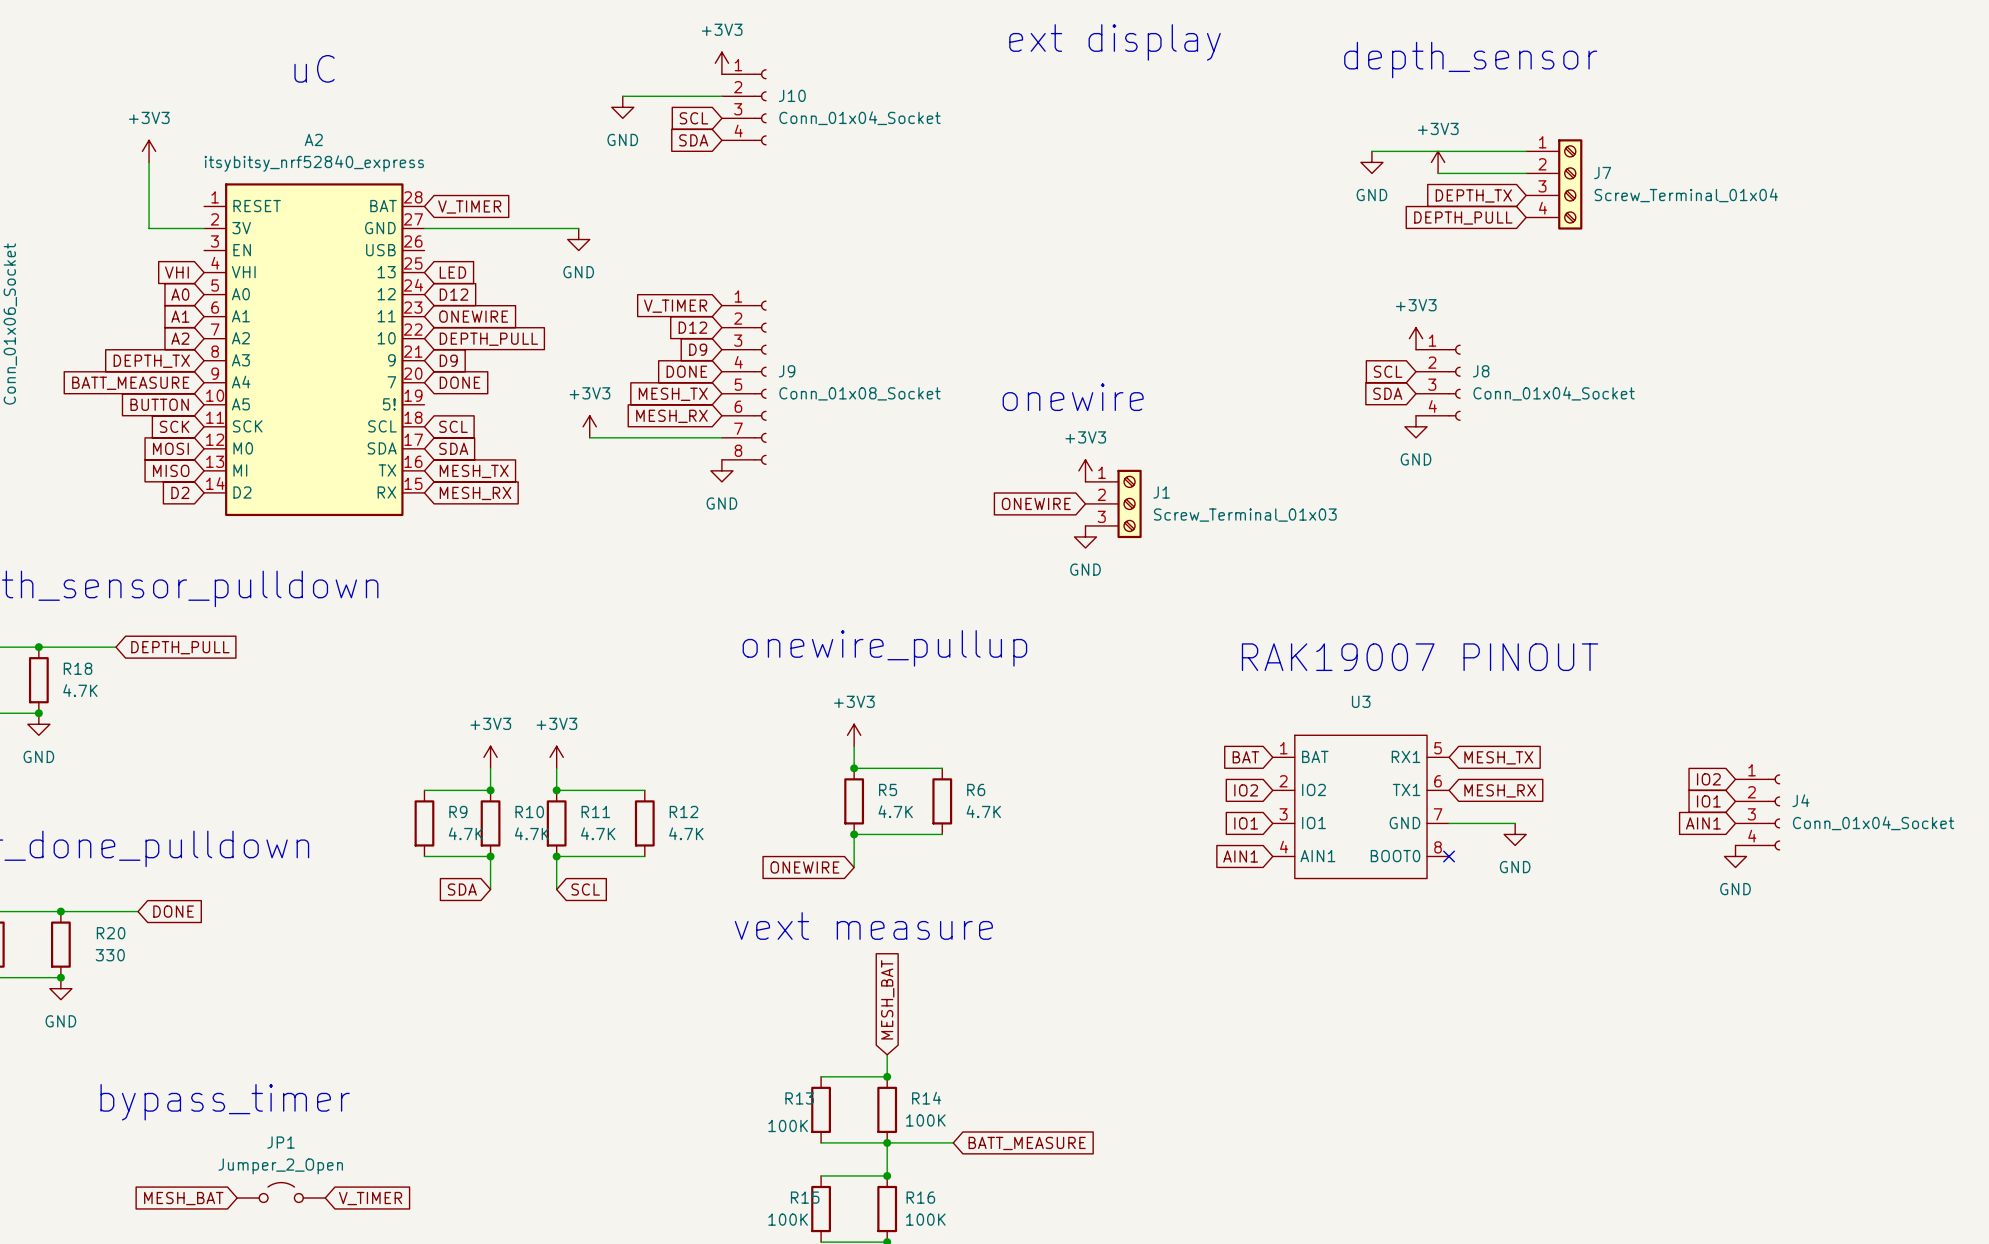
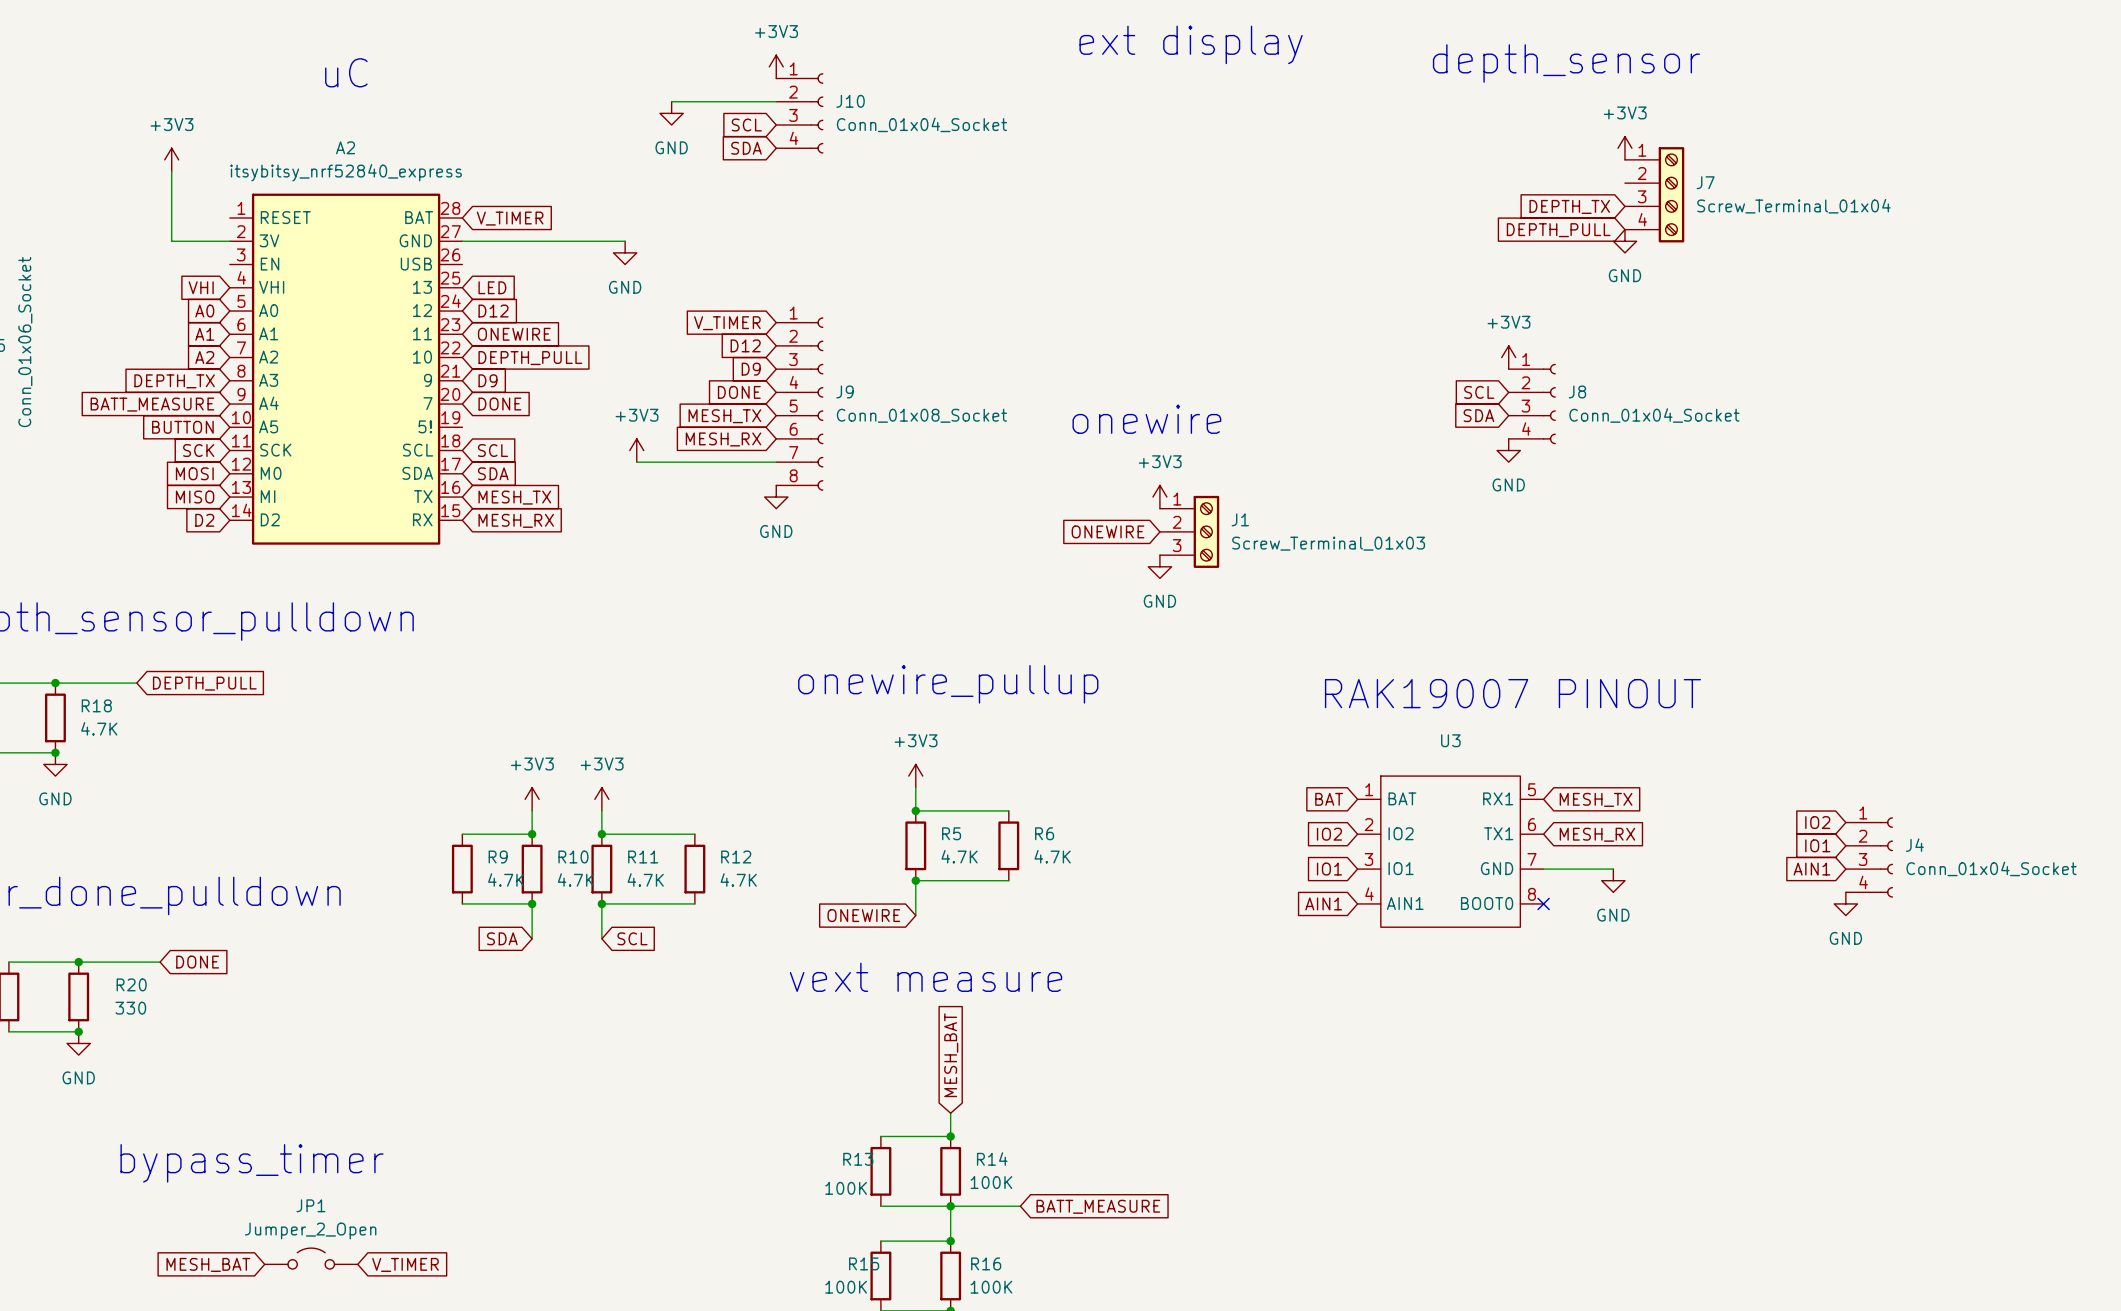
wire: (1371, 151) (1526, 151) -> none
power symbol position: GND (1371, 162) -> GND (1624, 241)
power symbol position: +3V3 (1438, 162) -> +3V3 (1624, 148)
wire: (1438, 173) (1526, 173) -> none

